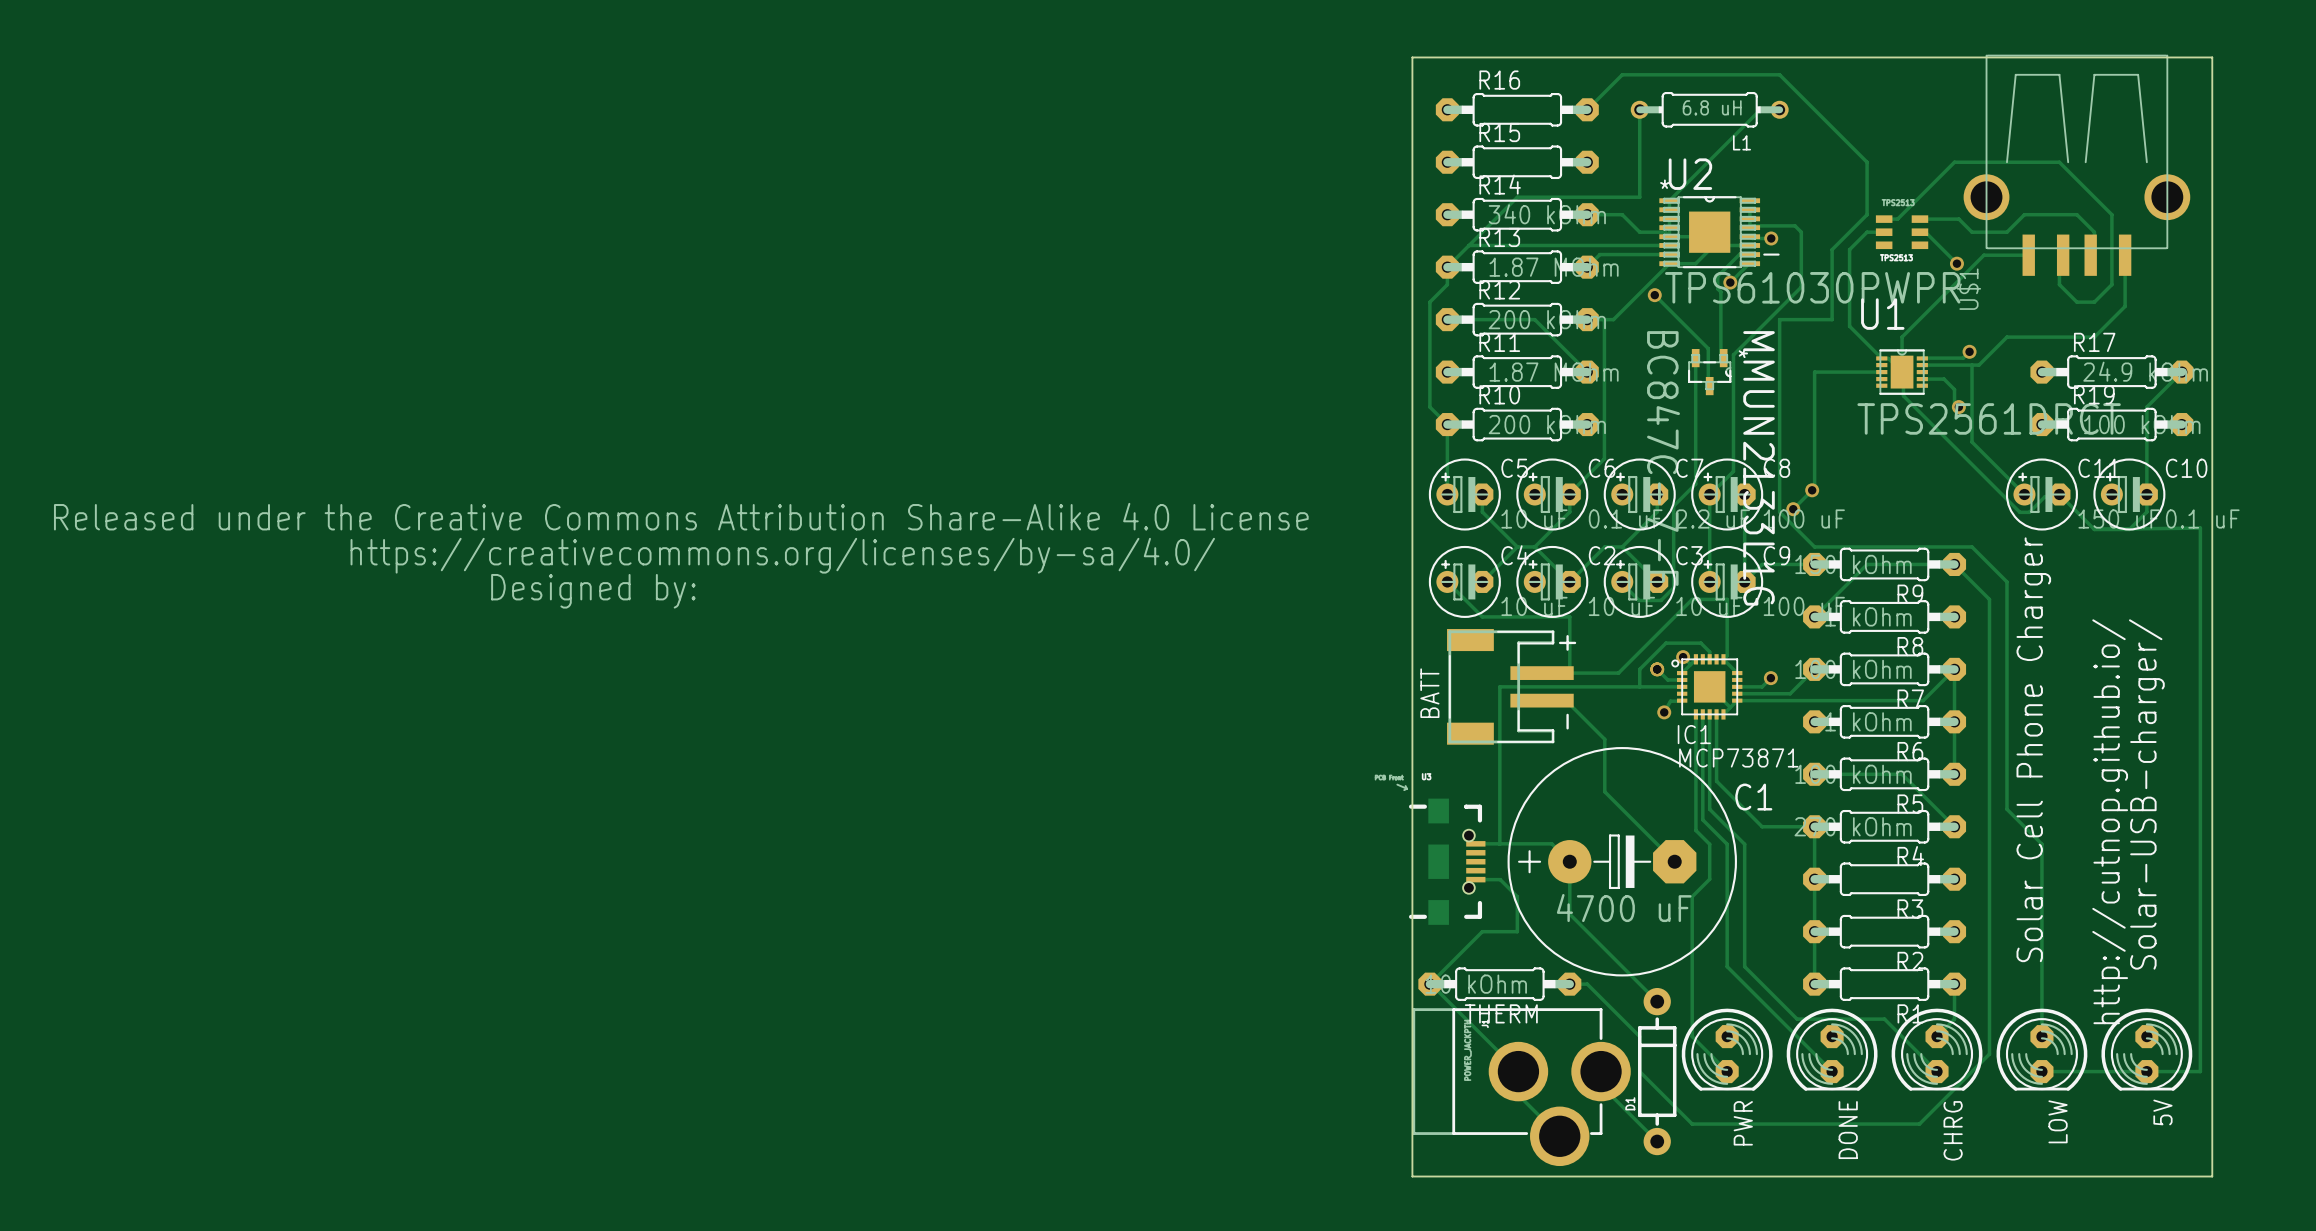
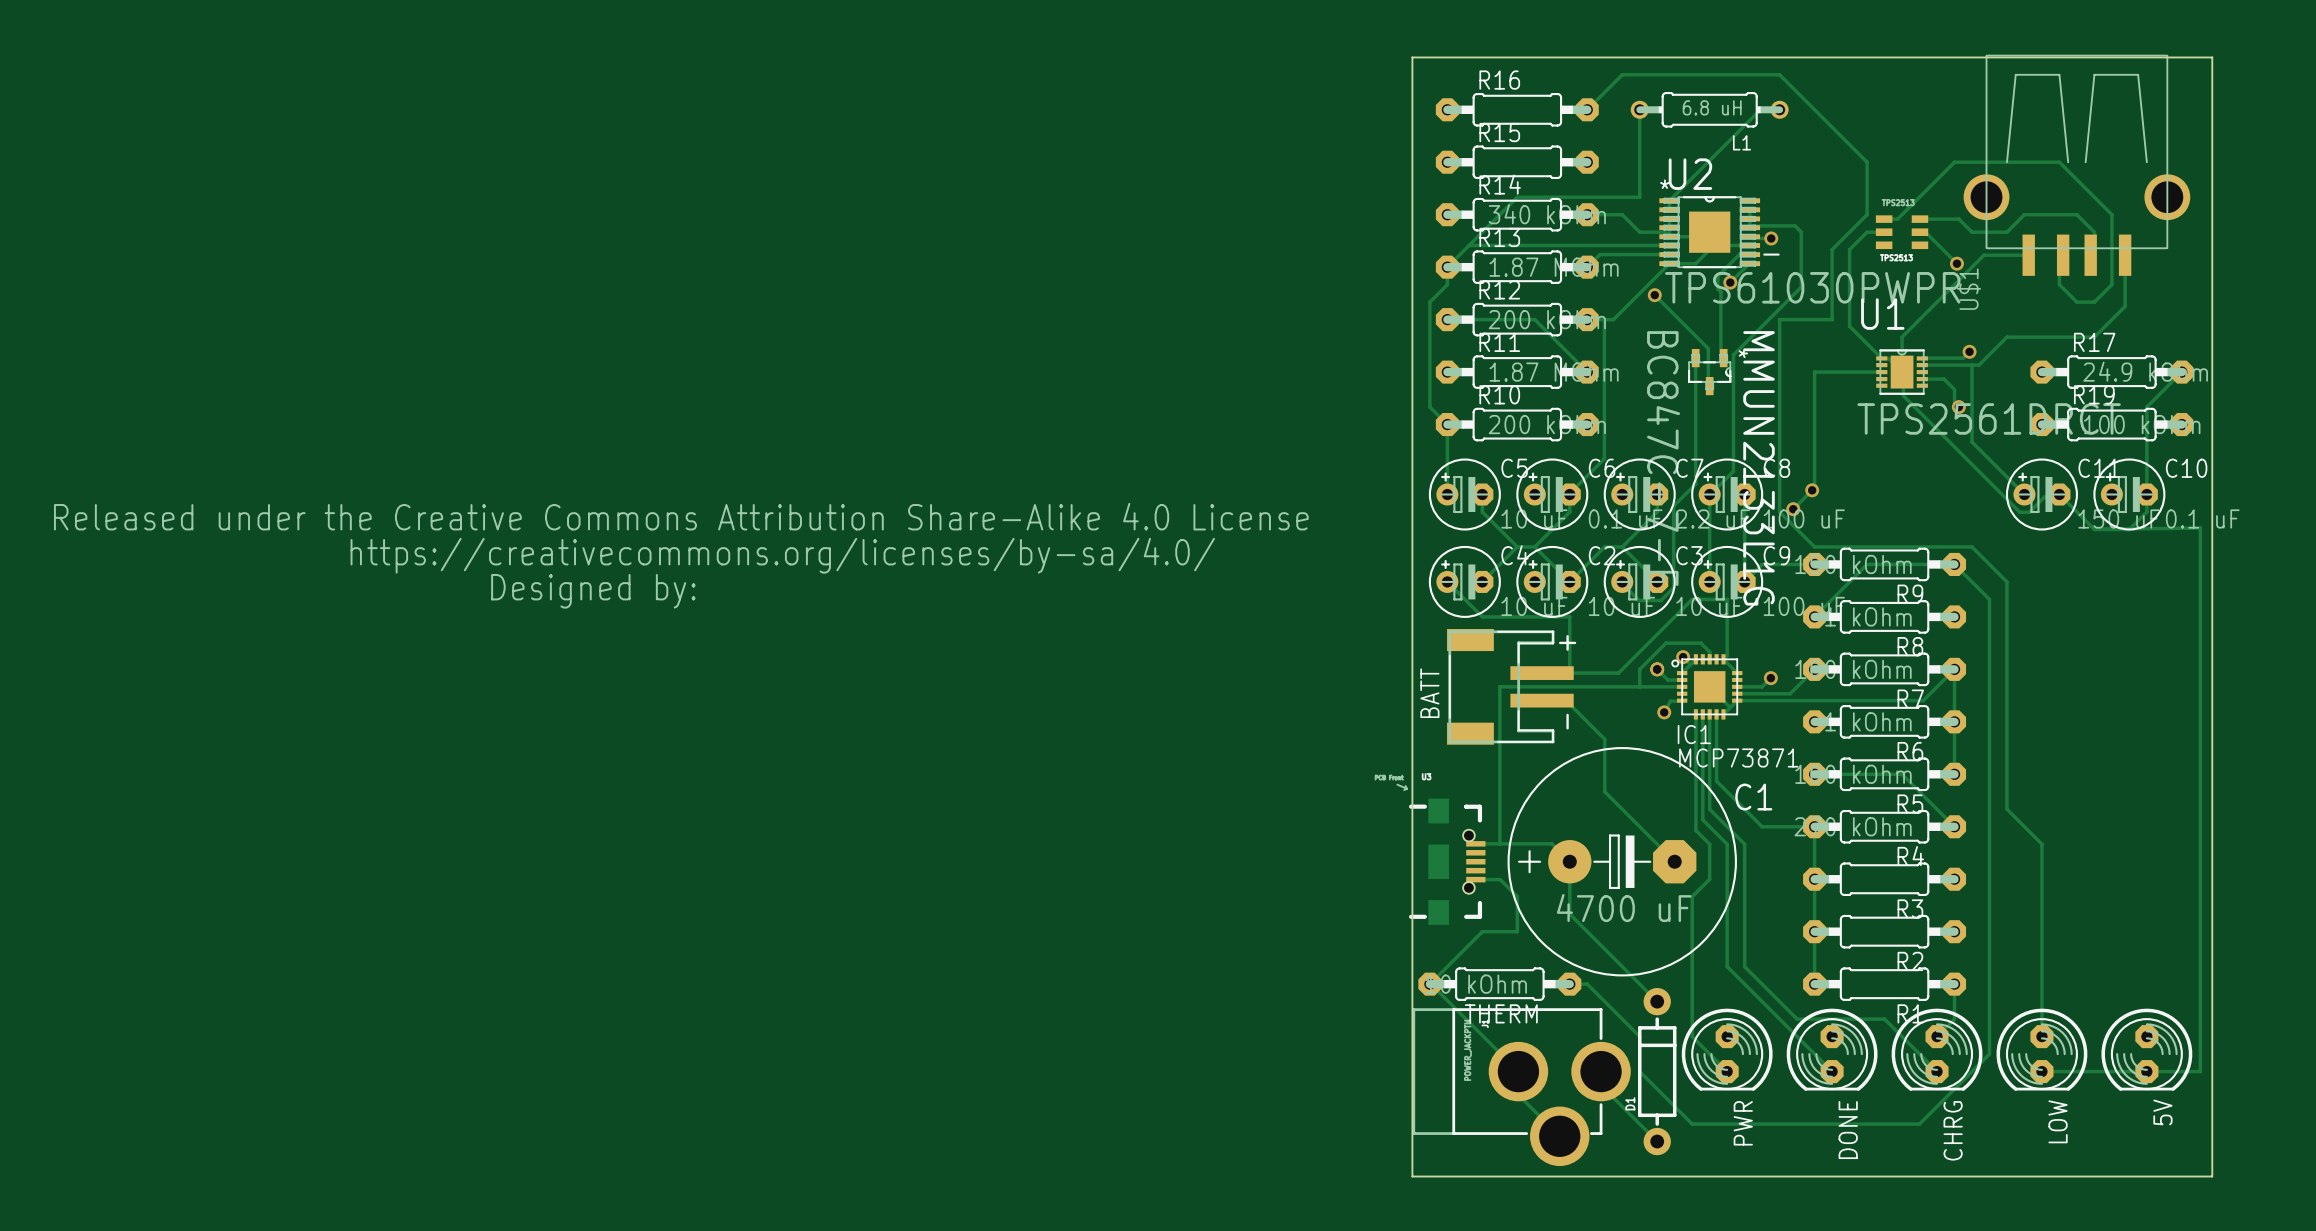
text: Solar Cell Phone Charger (2033, 749) -> none
text: Solar-USB-charger/ (2146, 794) -> none
text: http://cutnop.github.io/ (2110, 821) -> none

